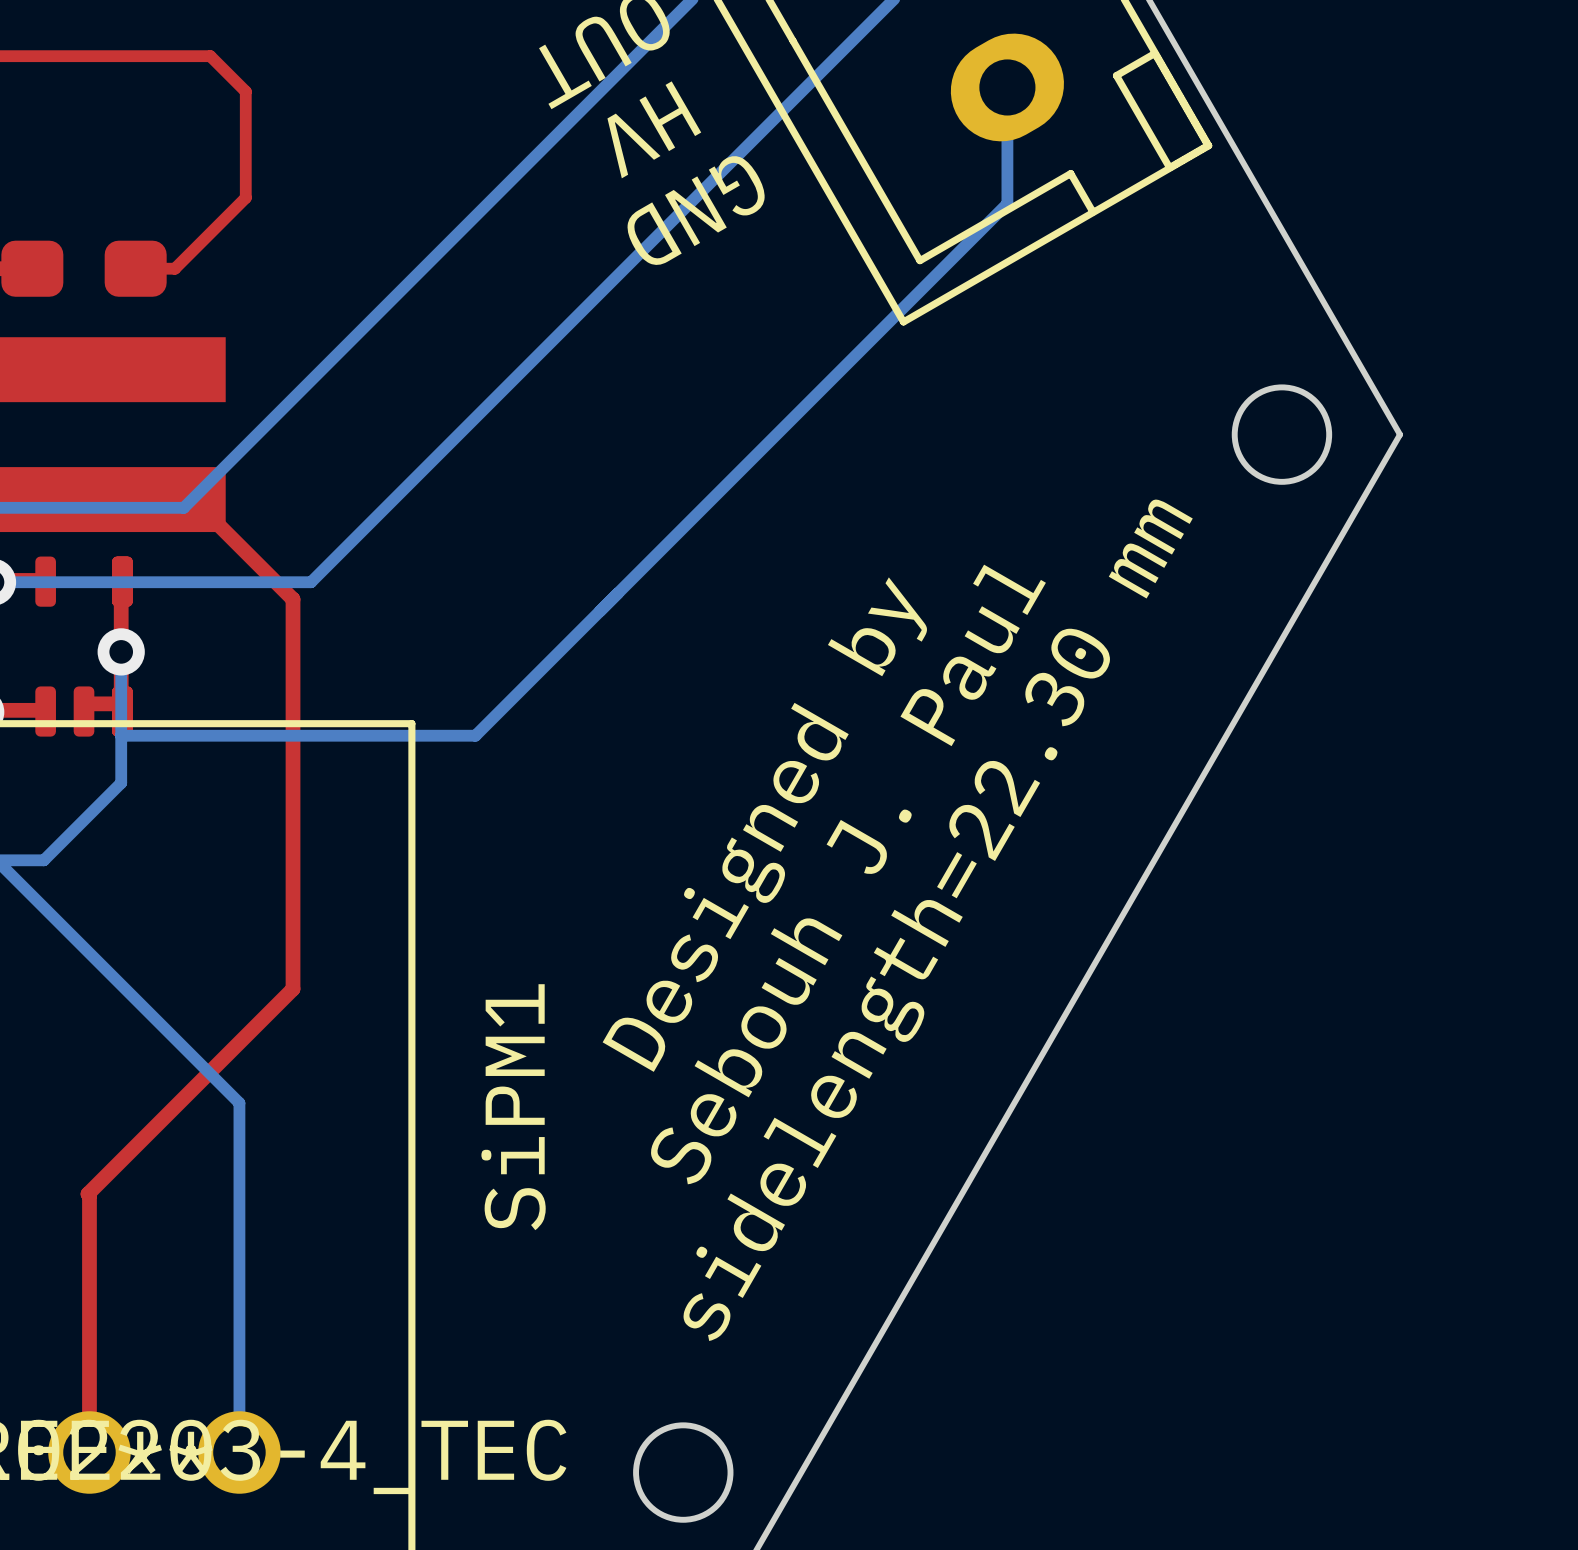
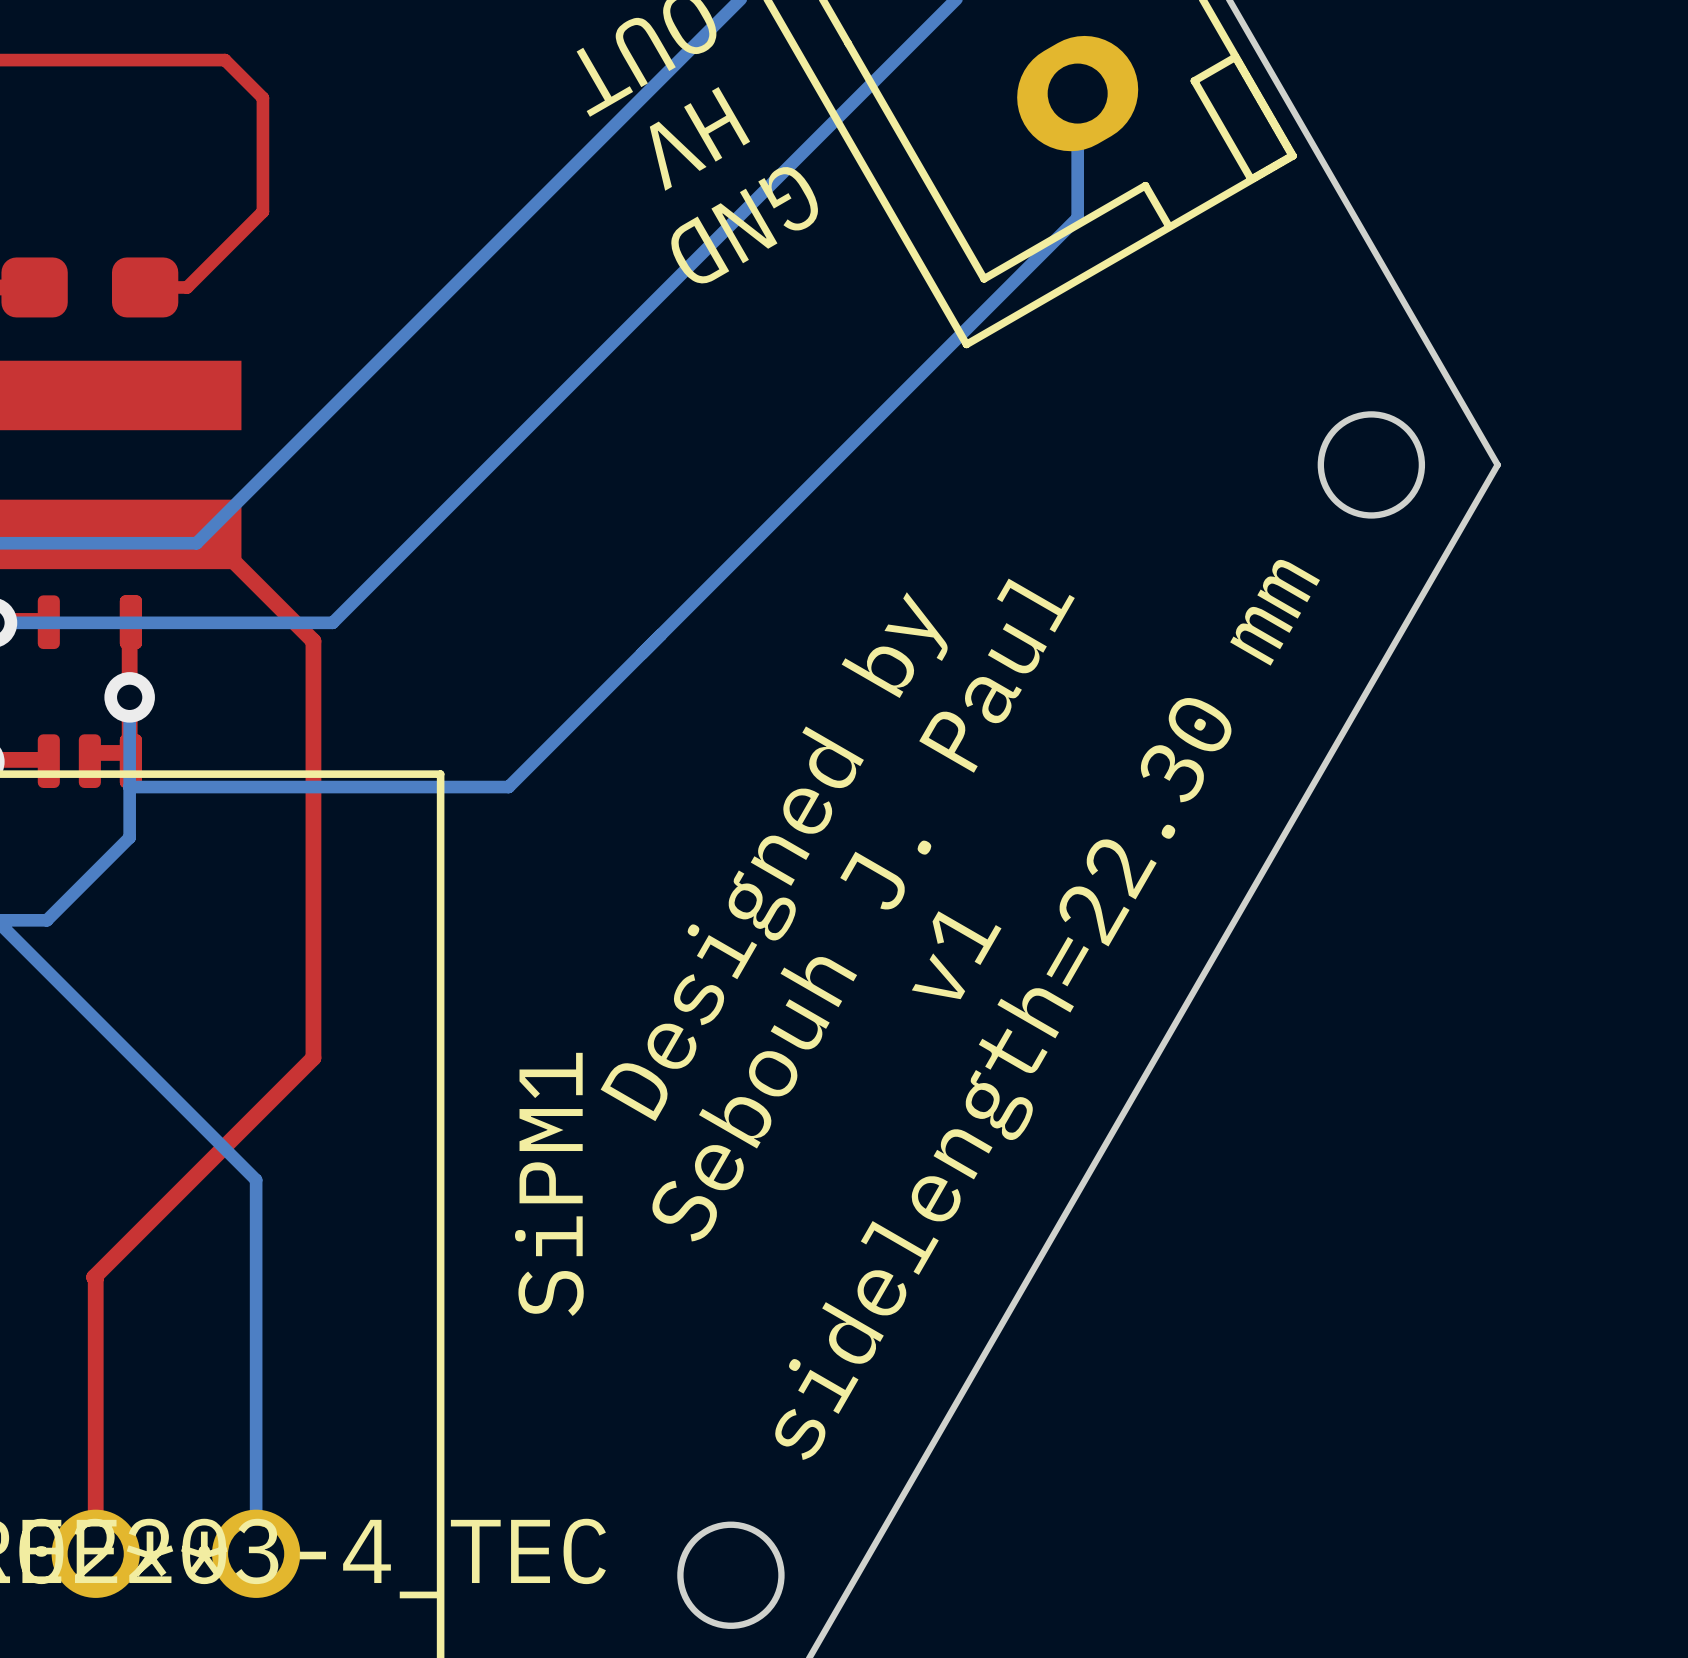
text position: Designed by (764, 824) -> Designed by (774, 856)
text position: Sebouh J. Paul (848, 874) -> Sebouh J. Paul (863, 910)
text: none -> v1 (956, 955)
text position: sidelength=22.30 mm (938, 920) -> sidelength=22.30 mm (1047, 1009)

